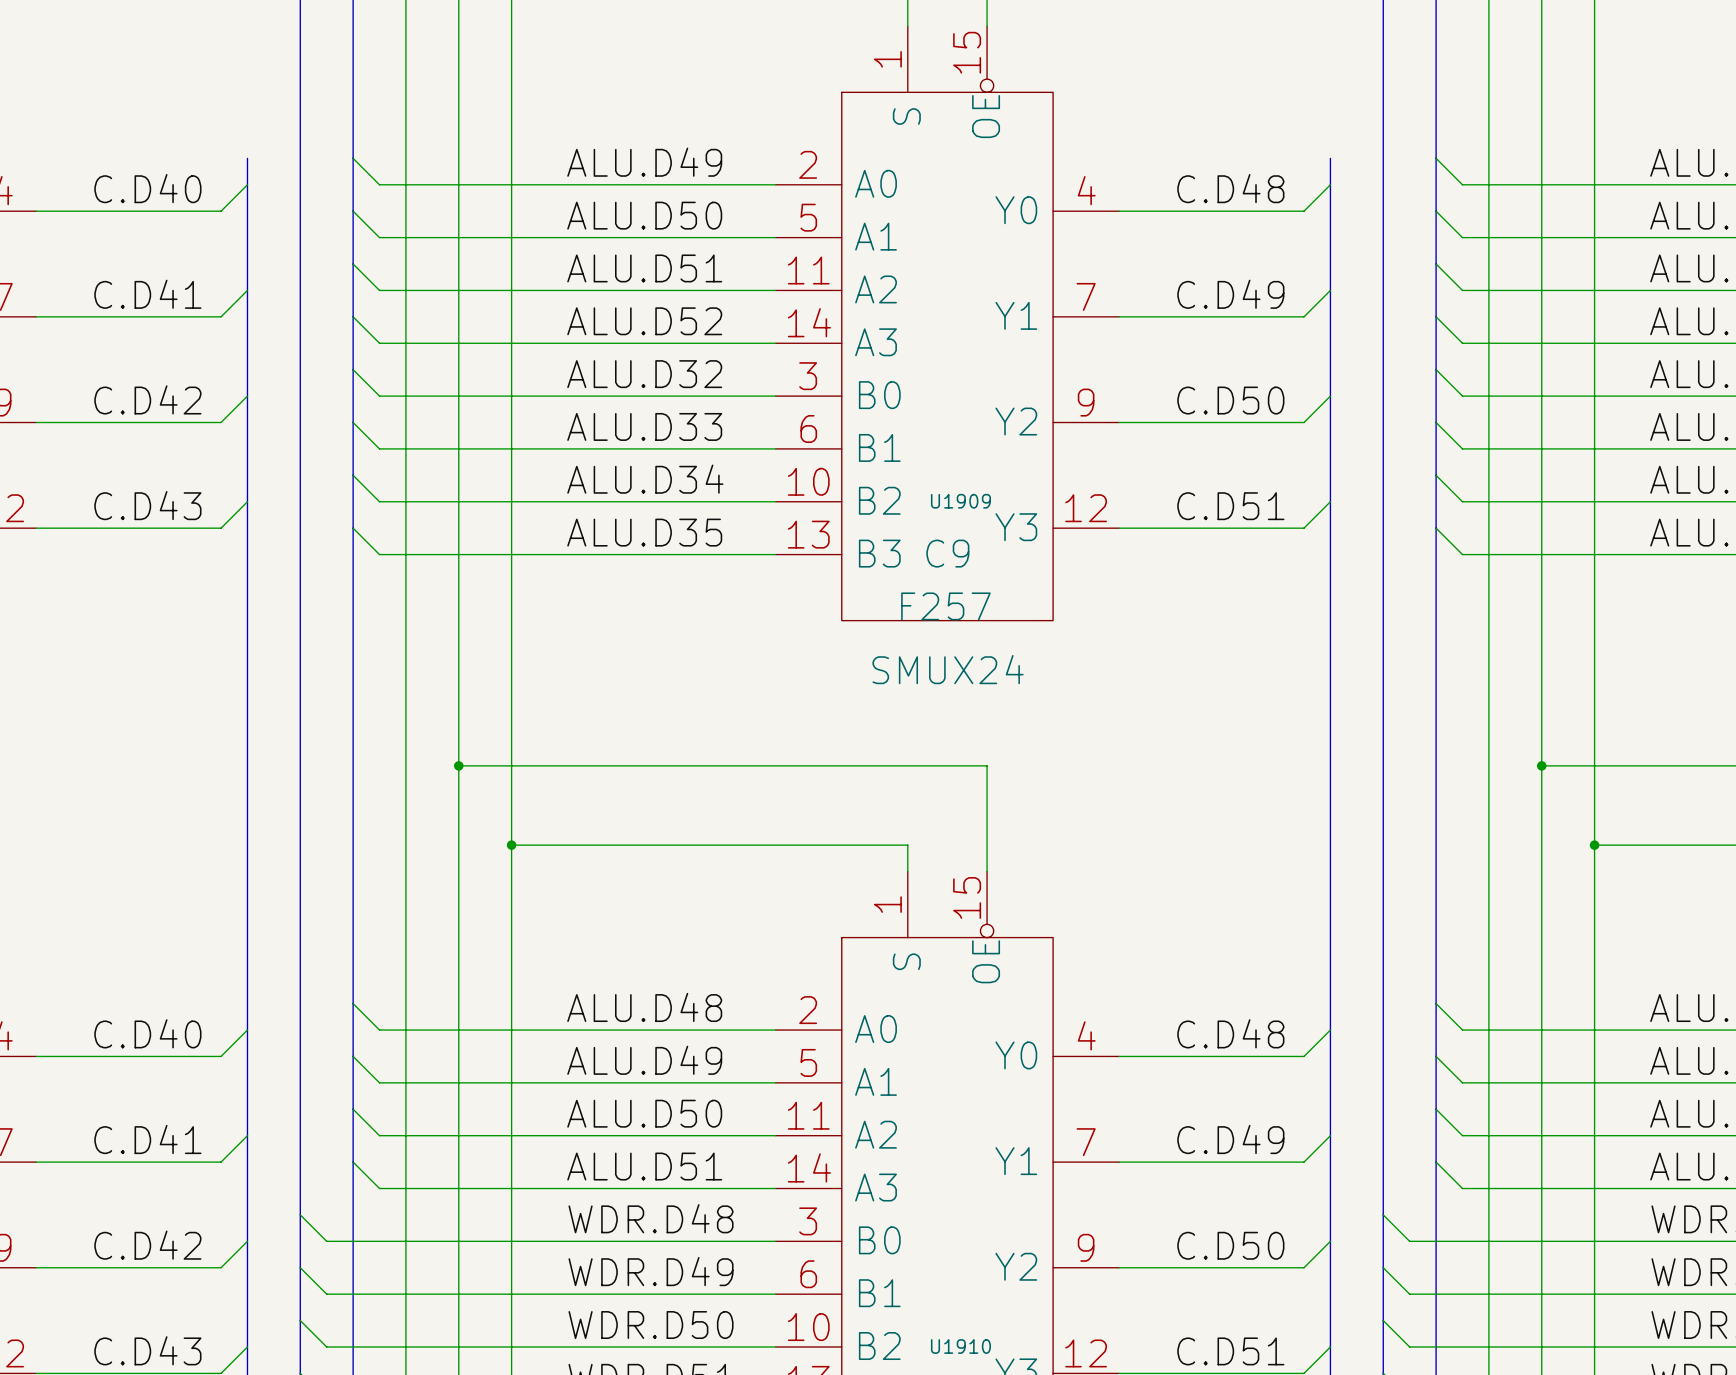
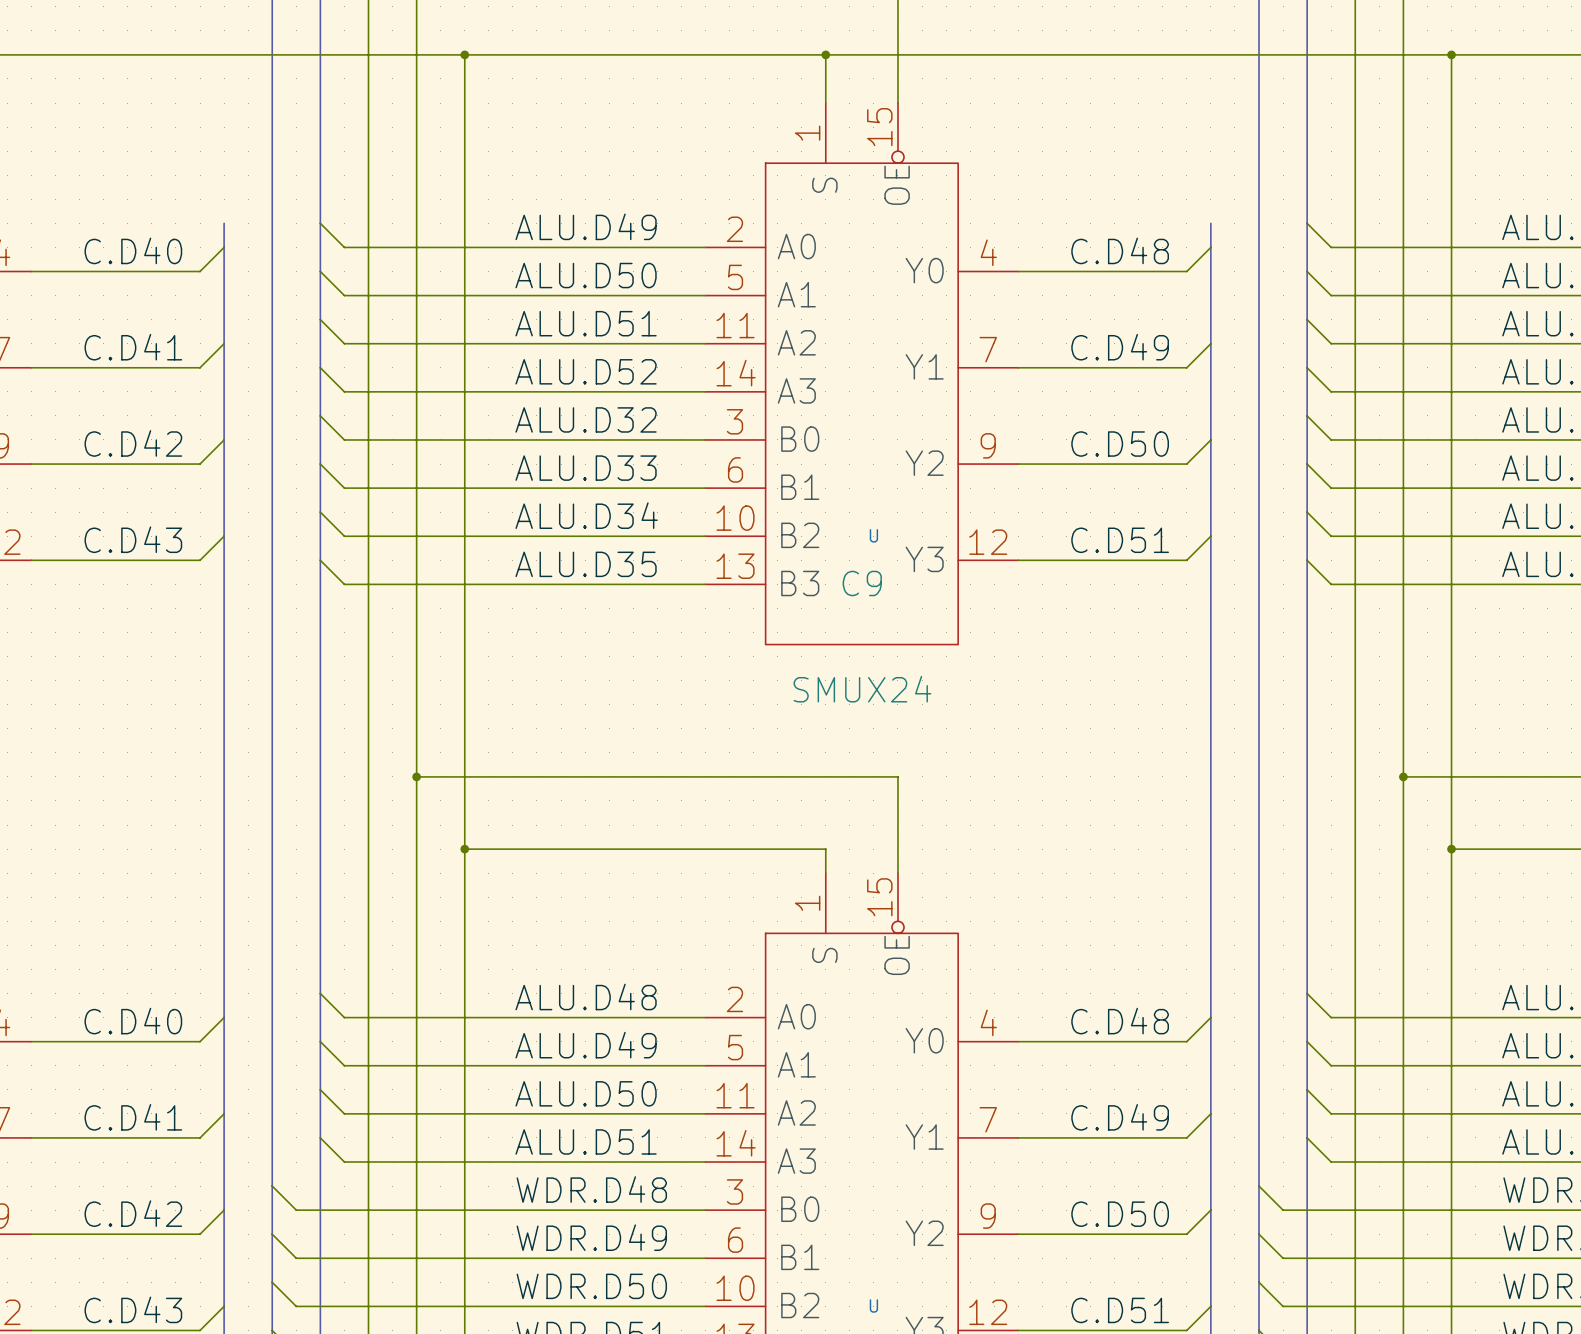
U1909 name: U1909 (960, 501) -> U (873, 535)
U1909 value: F257 (945, 606) -> none
U1910 name: U1910 (960, 1346) -> U (873, 1305)

